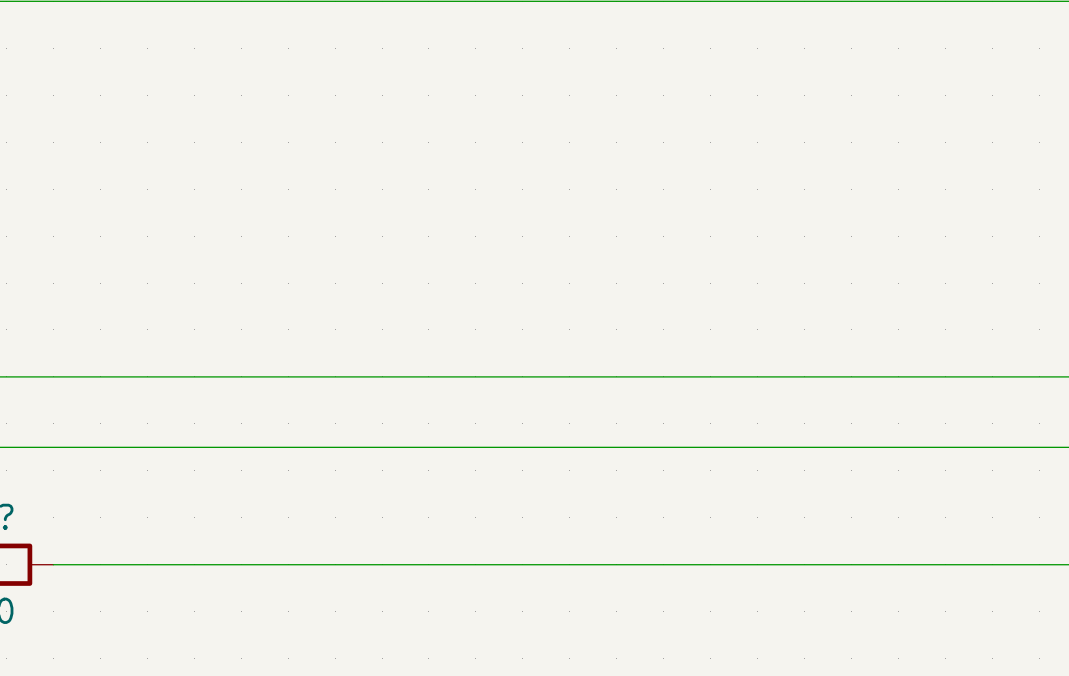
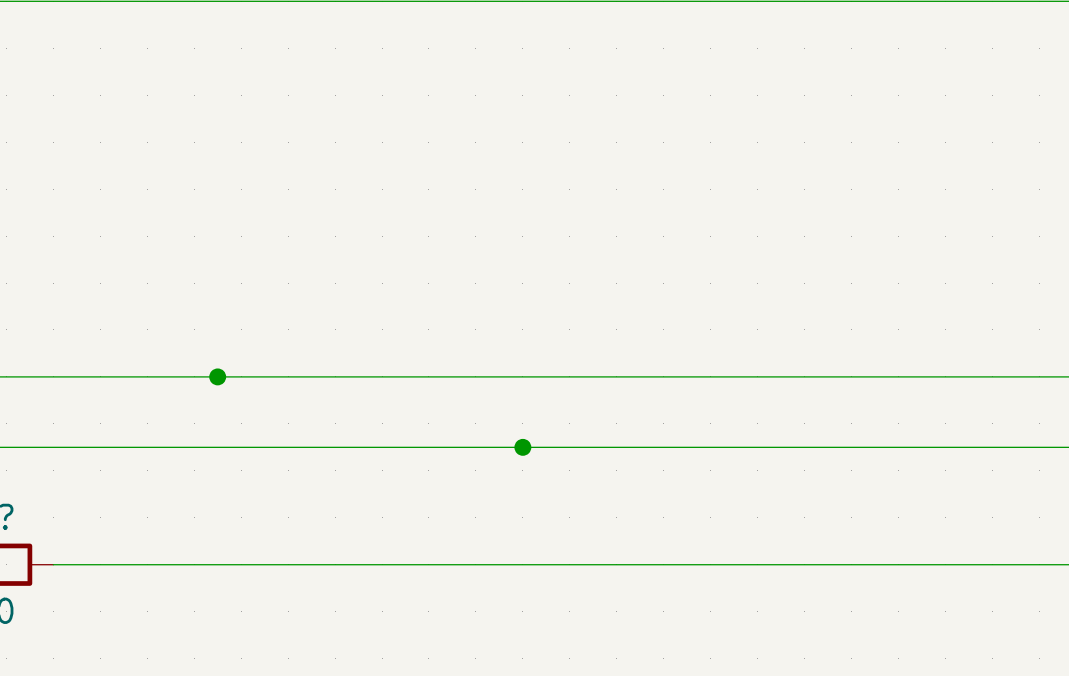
junction: none -> (217, 376)
junction: none -> (522, 447)

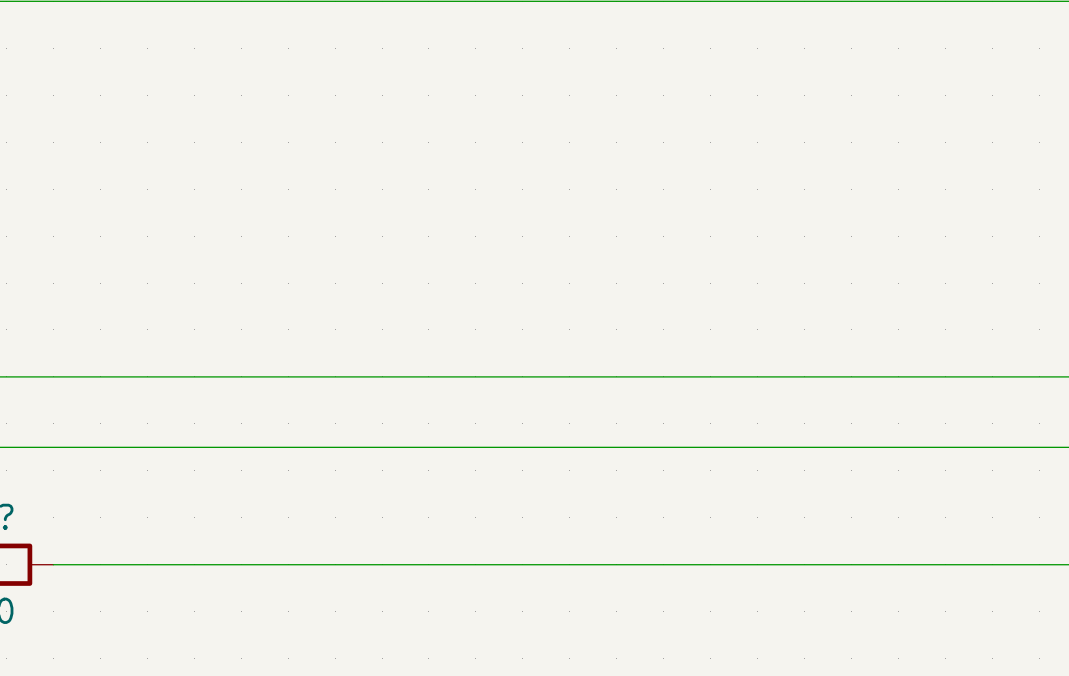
junction: (217, 376) -> none
junction: (522, 447) -> none

